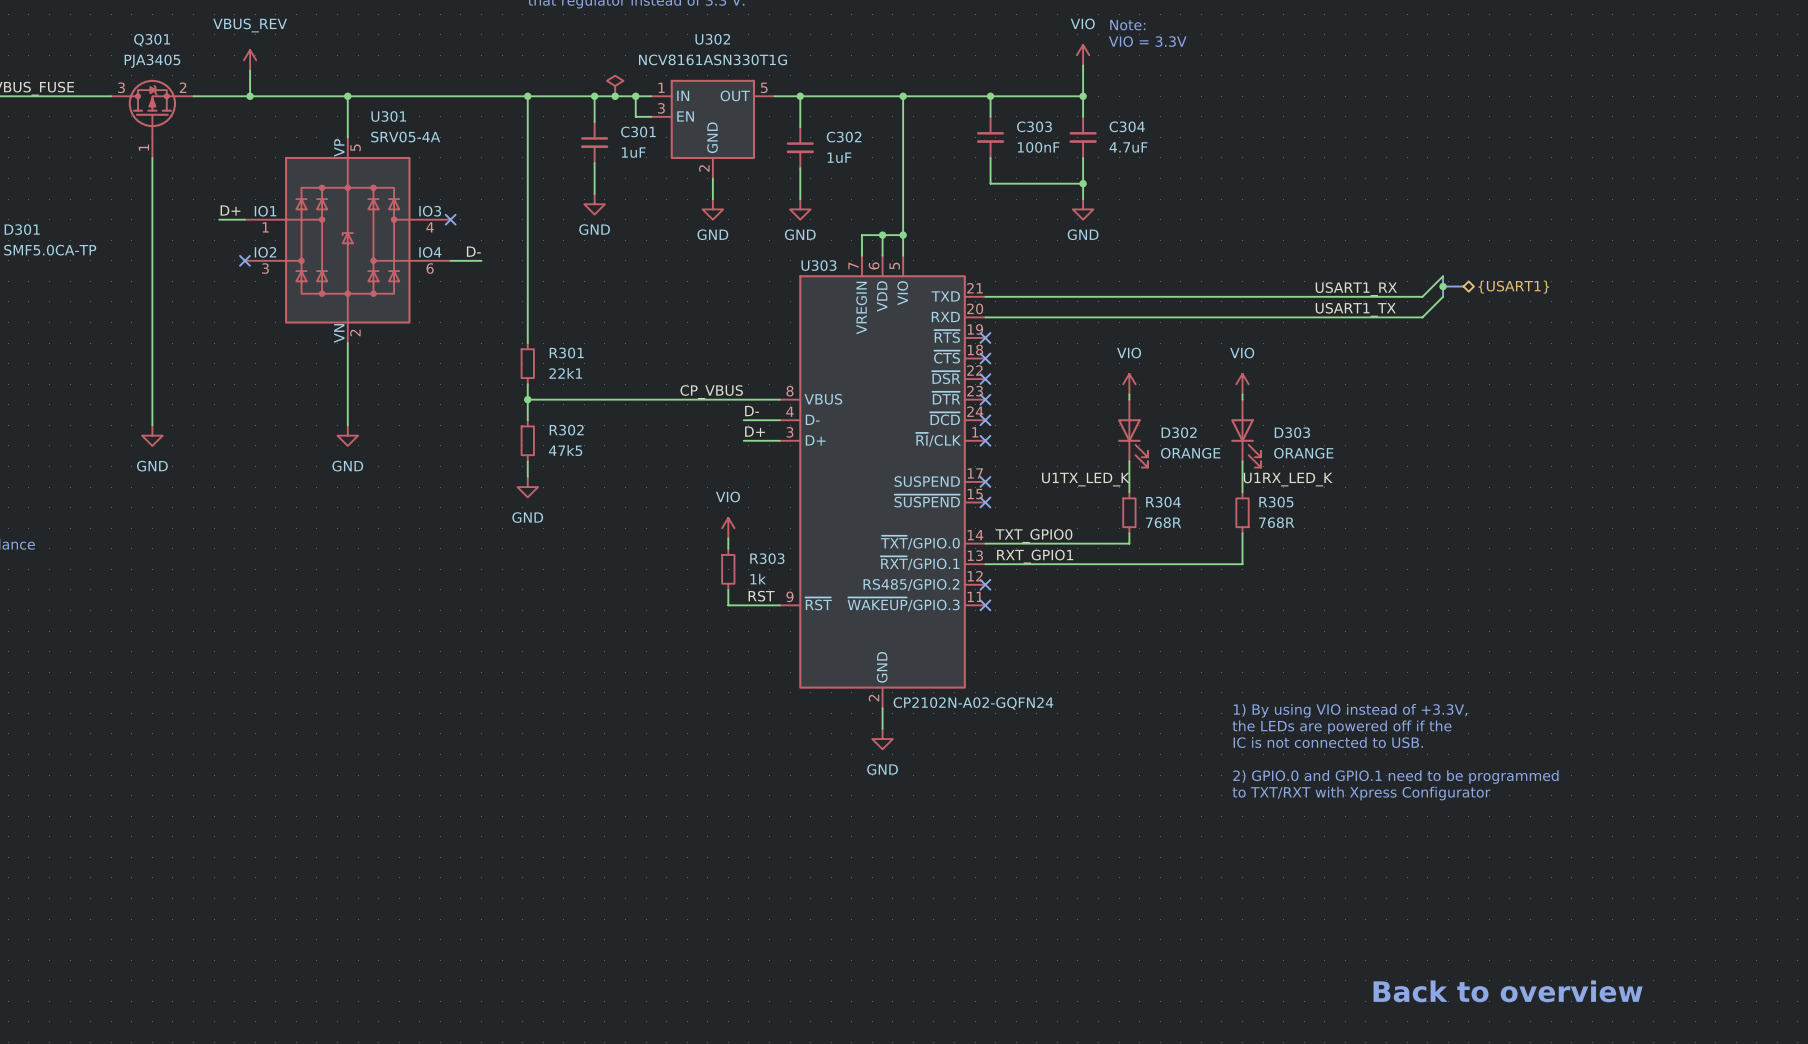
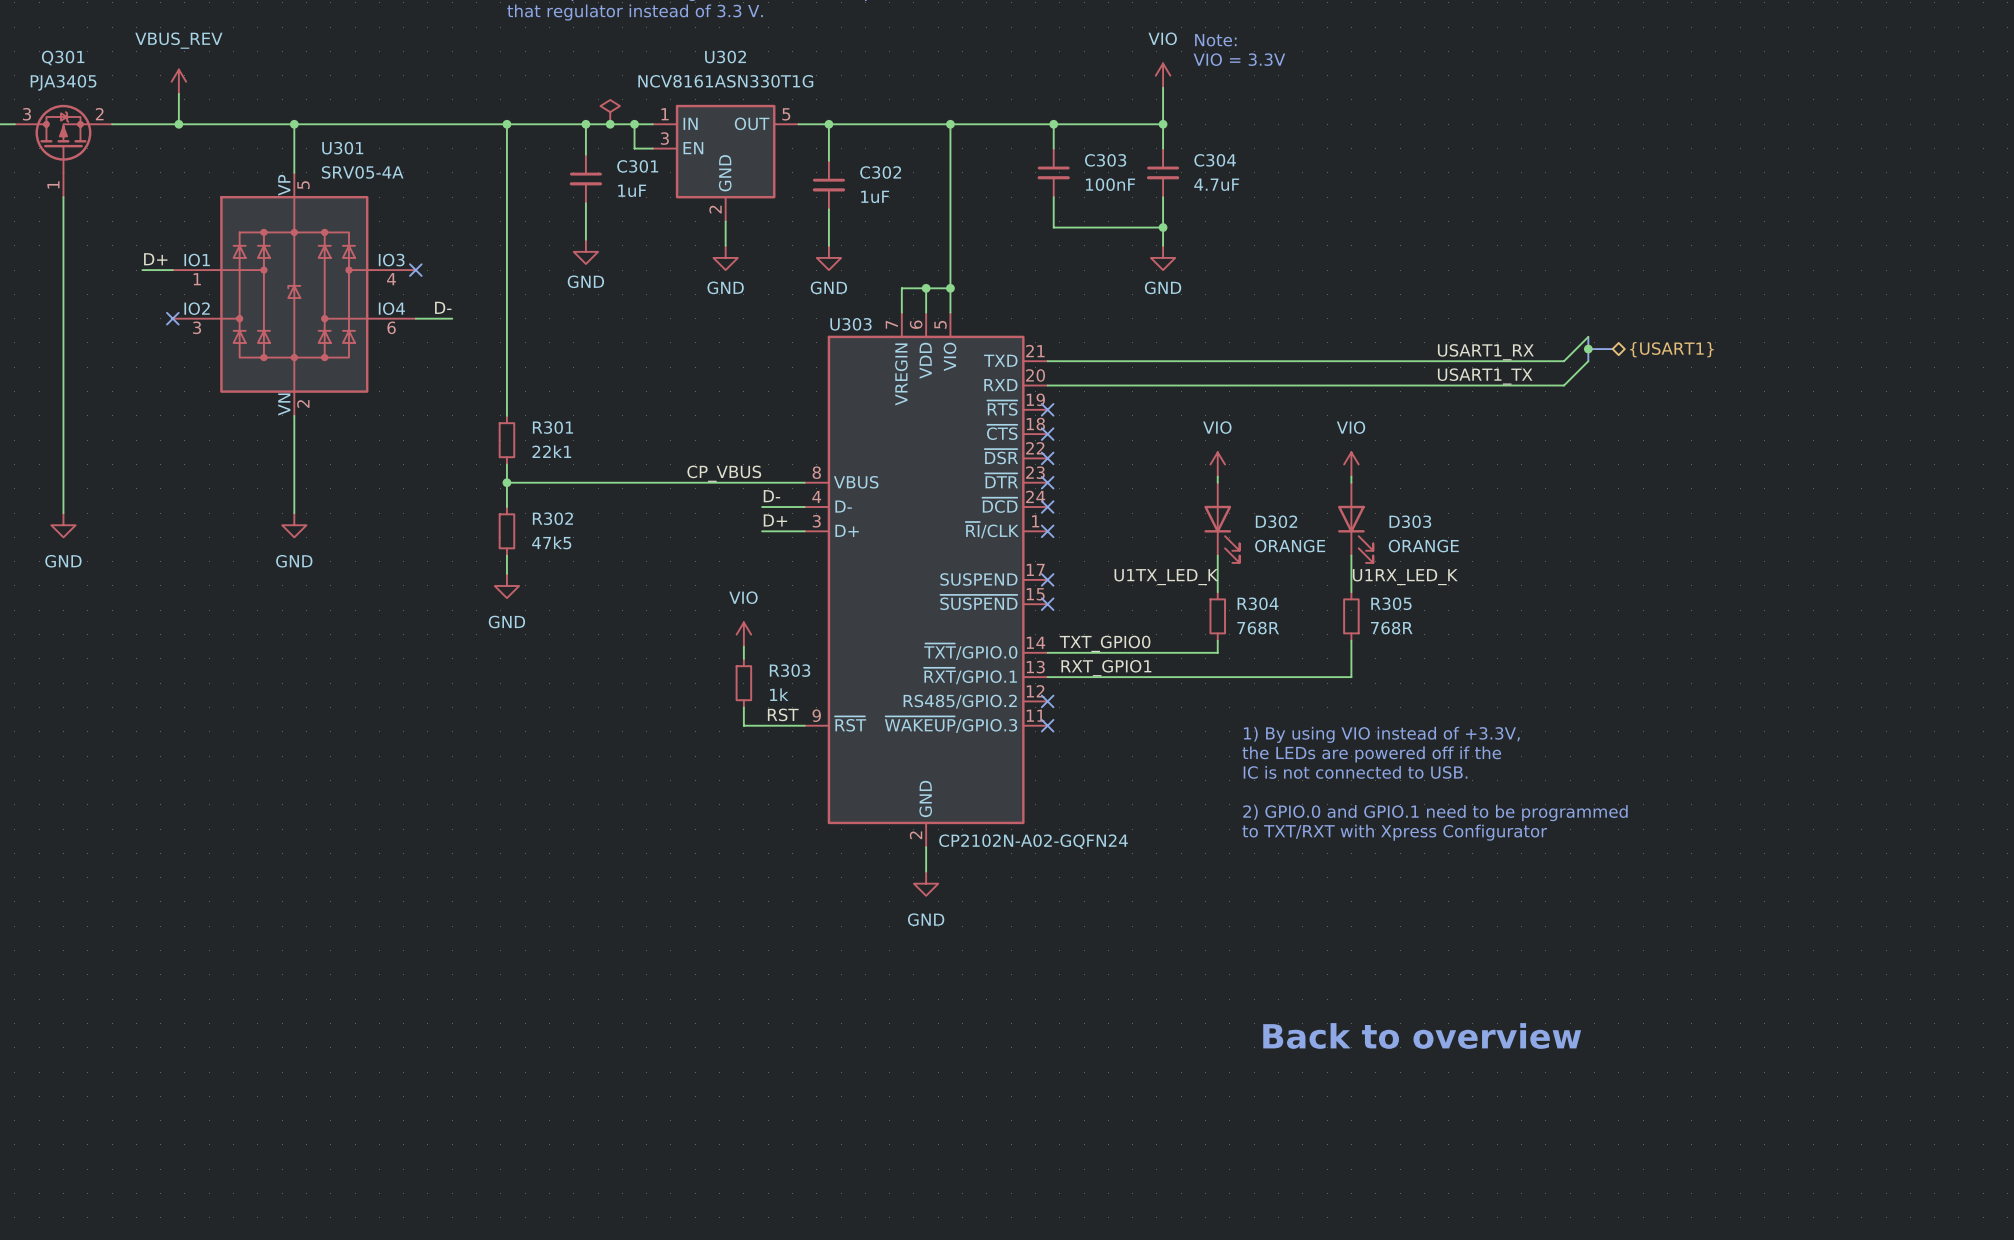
text position: 1) By using VIO instead of +3.3V, (1350, 710) -> 1) By using VIO instead of +3.3V, (1381, 734)
text position: the LEDs are powered off if the (1342, 727) -> the LEDs are powered off if the (1371, 754)
text position: IC is not connected to USB. (1328, 742) -> IC is not connected to USB. (1355, 772)
text position: 2) GPIO.0 and GPIO.1 need to be programmed (1395, 777) -> 2) GPIO.0 and GPIO.1 need to be programmed (1435, 813)
text position: to TXT/RXT with Xpress Configurator (1361, 793) -> to TXT/RXT with Xpress Configurator (1394, 832)
text: none -> Back to overview (1422, 1035)
text: Back to overview (1508, 991) -> none

